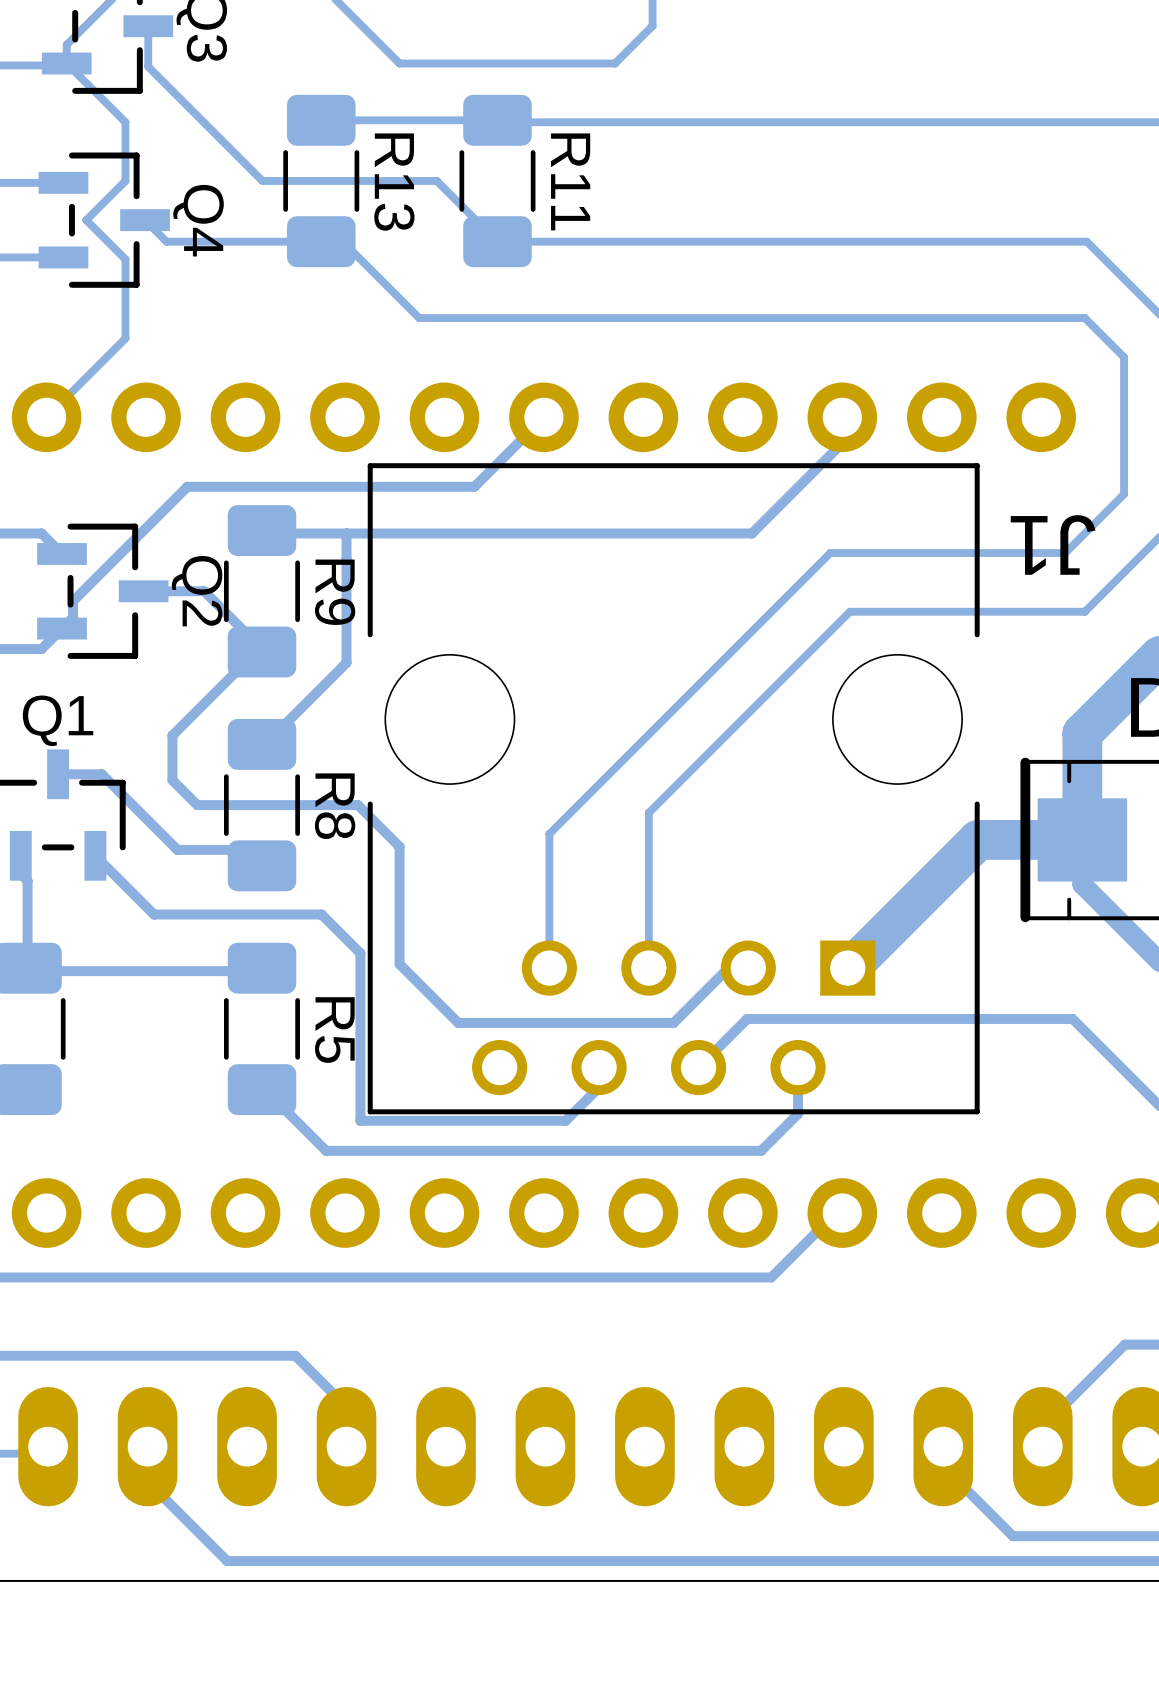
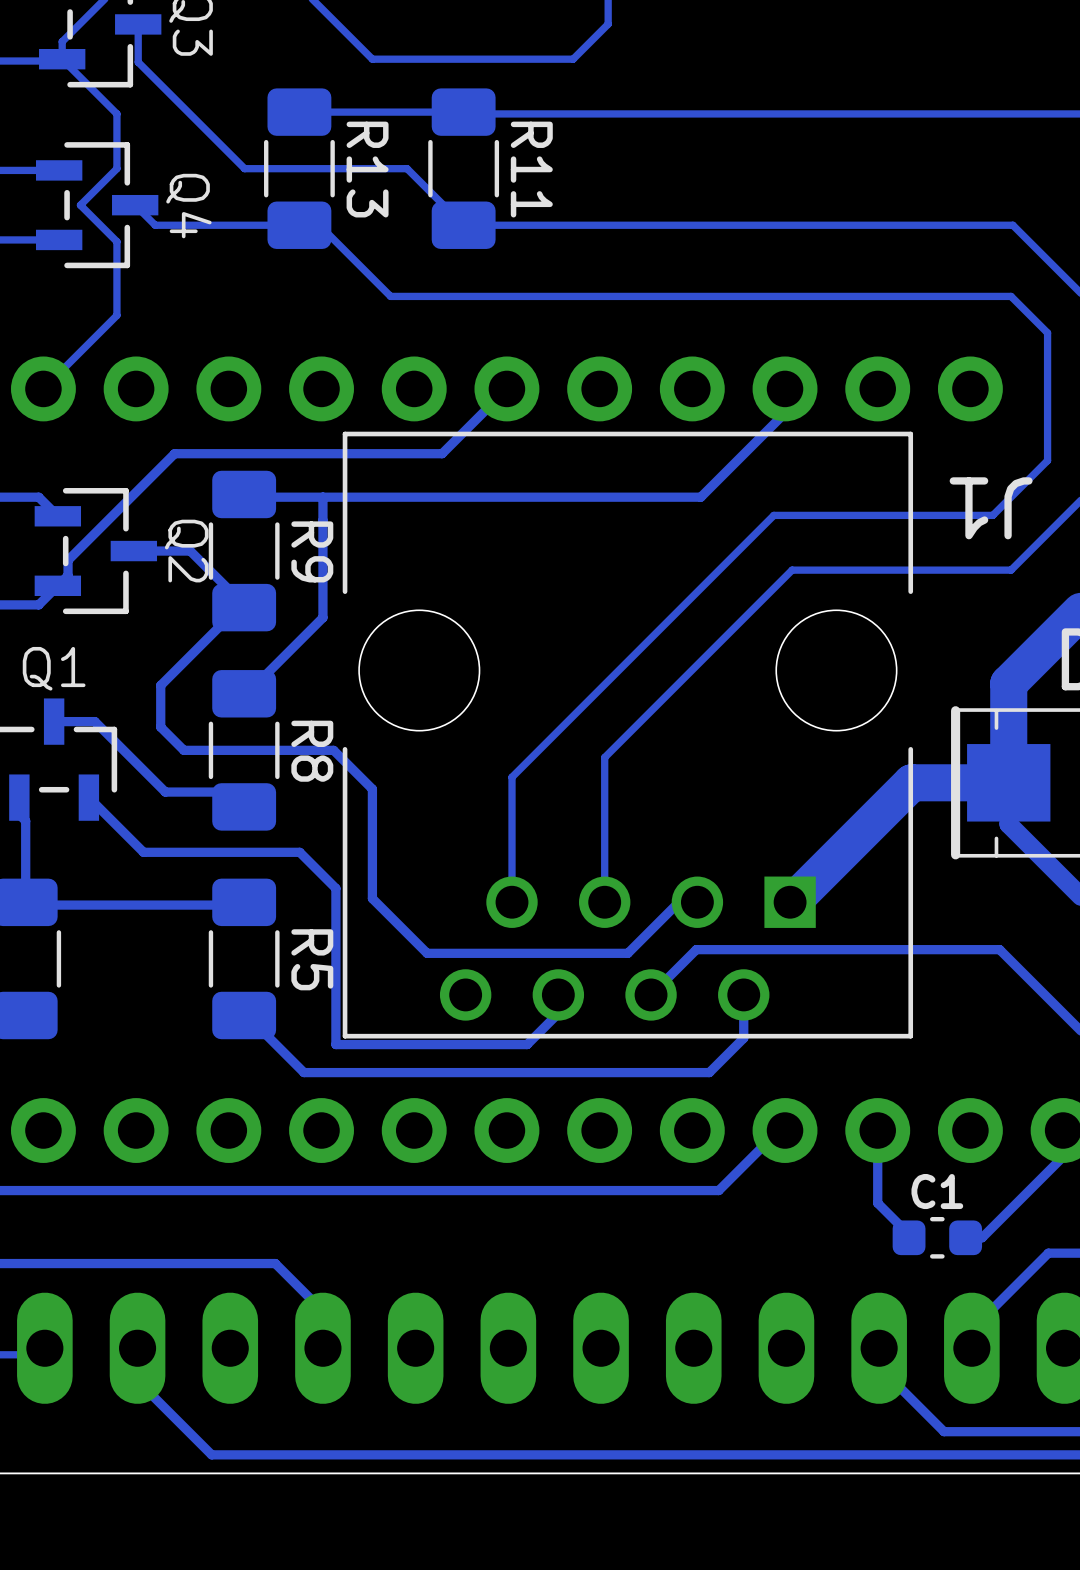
track: none -> (877, 1130) (877, 1203) (909, 1234) (909, 1237)
track: none -> (1063, 1130) (1063, 1156) (982, 1237) (965, 1237)
C1: none -> (937, 1237)

